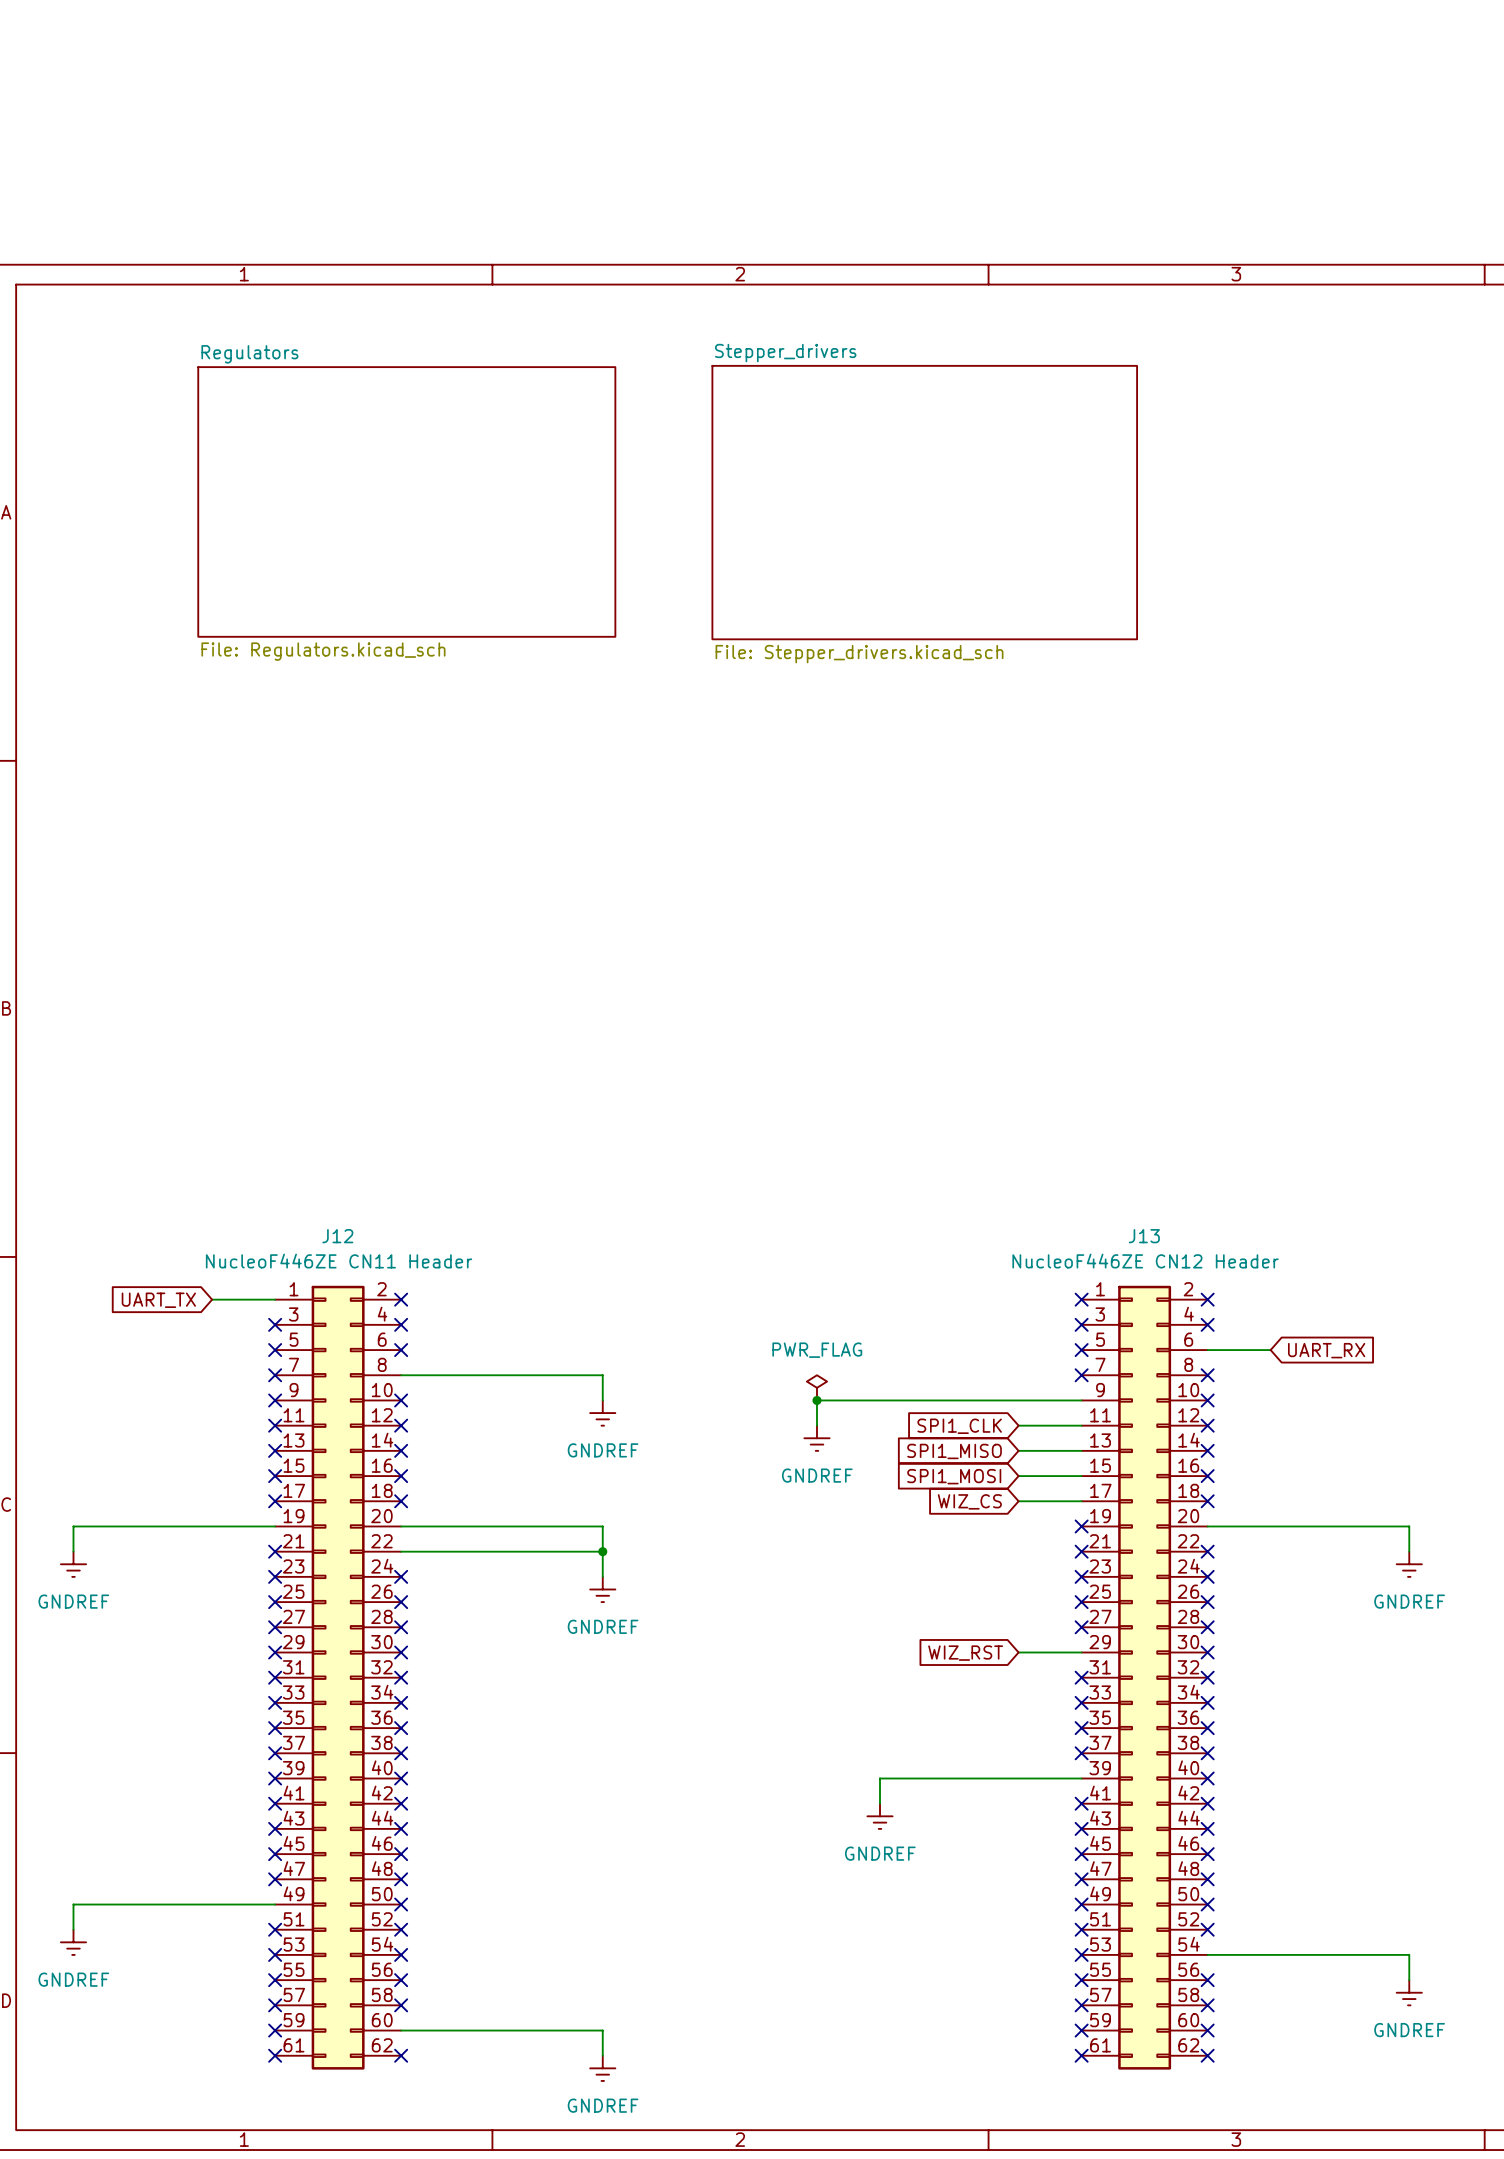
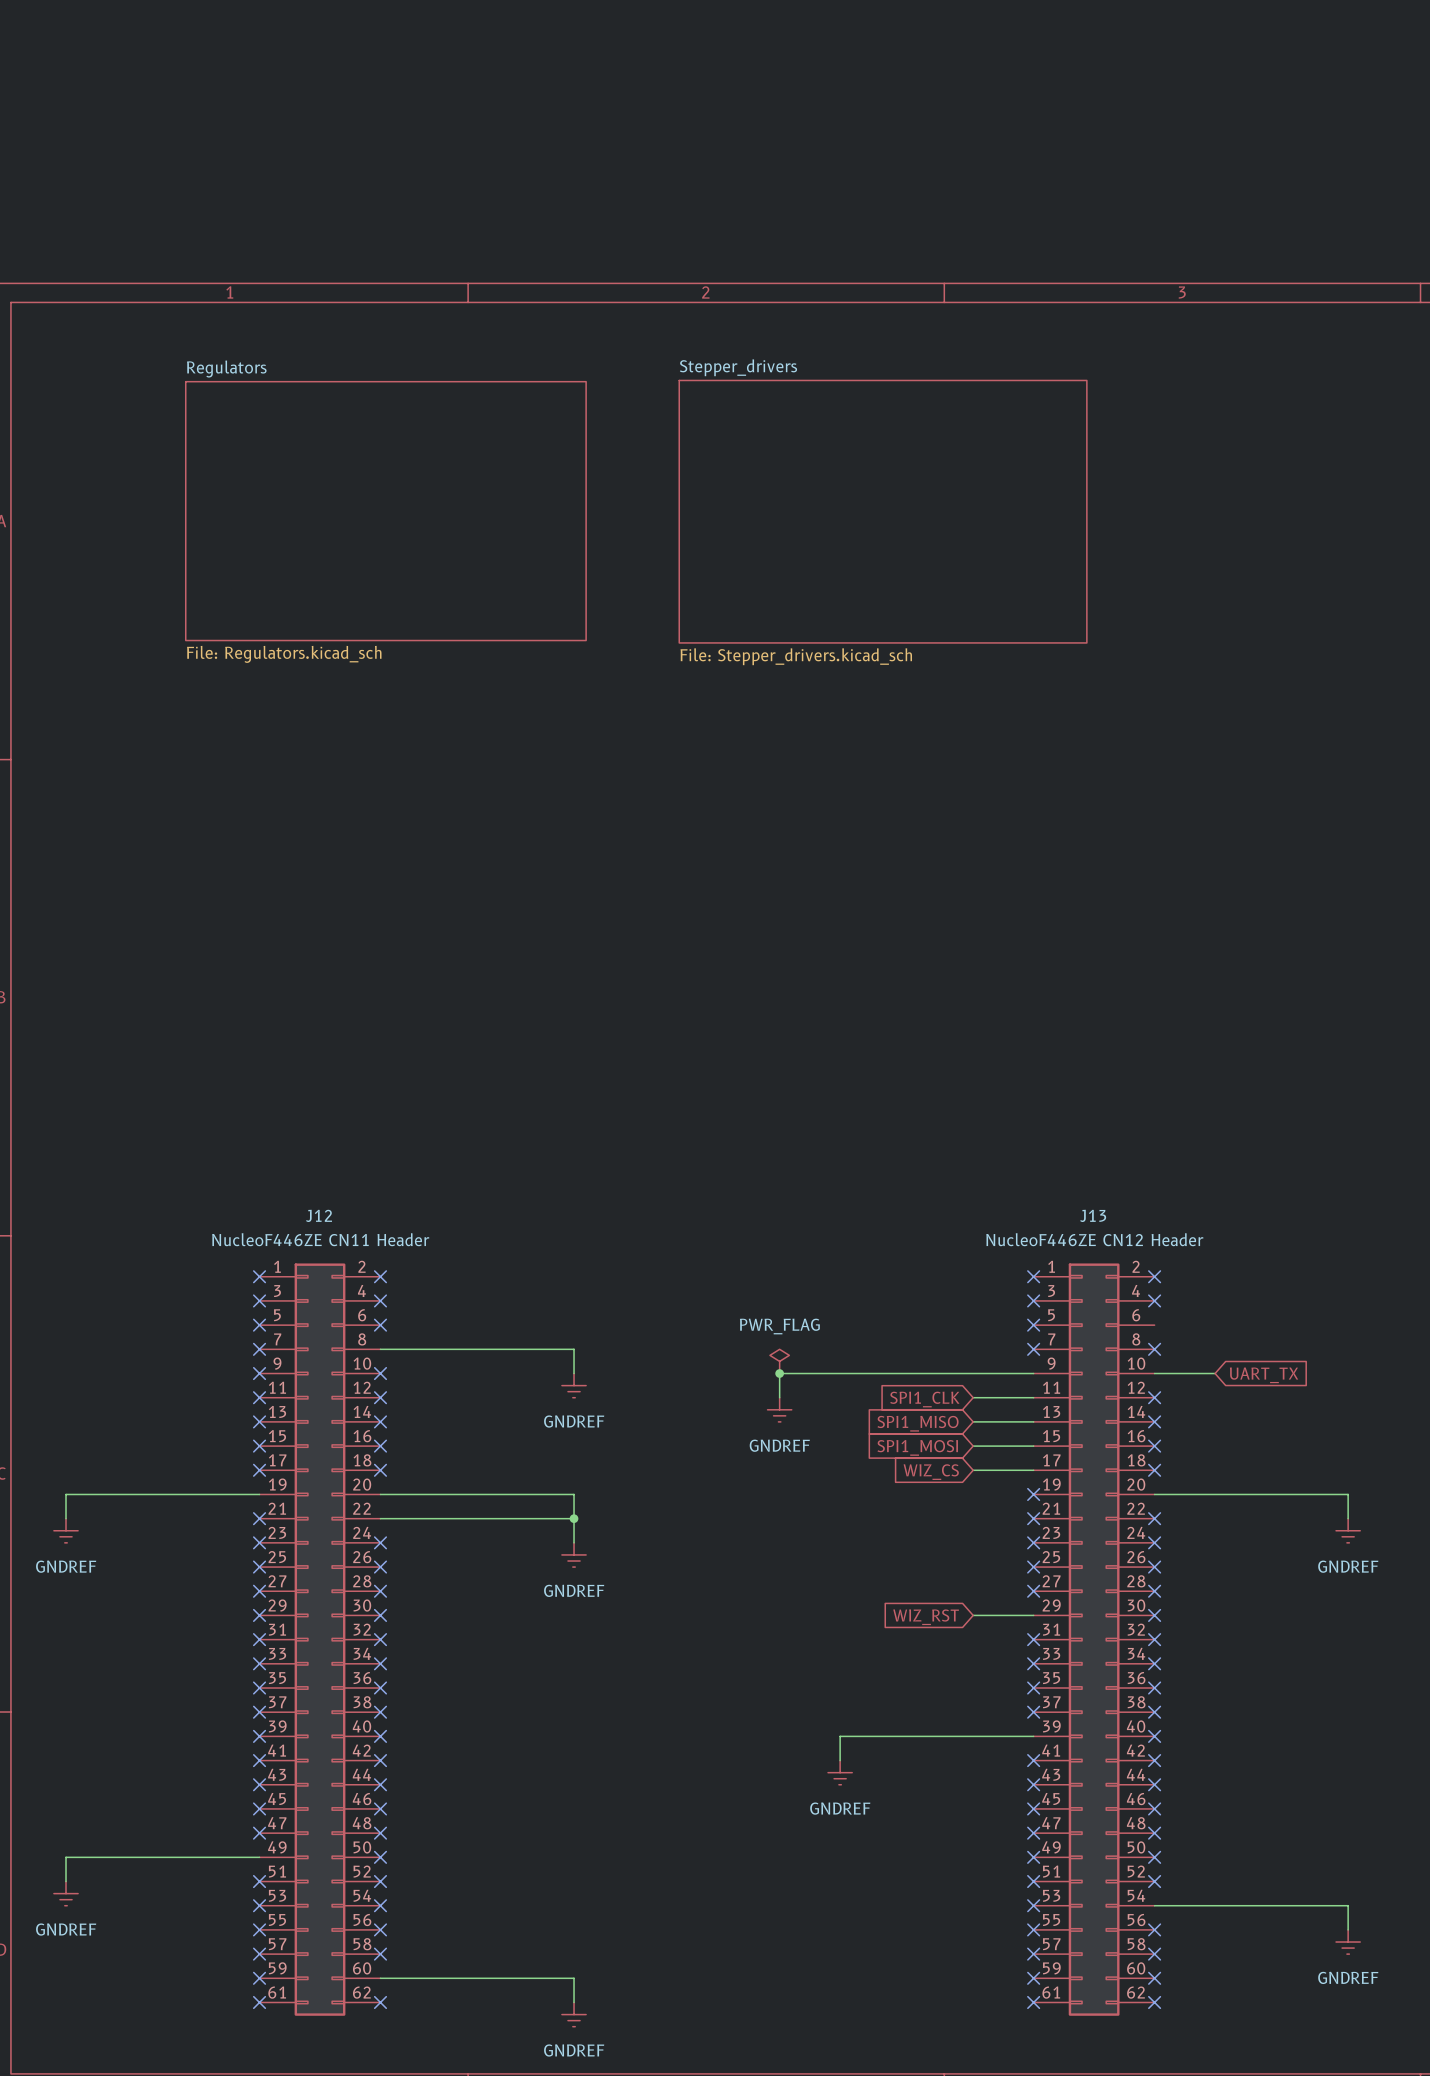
wire: (212, 1299) (275, 1299) -> none
no-connect mark: none -> (259, 1276)
global label: UART_TX (158, 1300) -> none
wire: (1207, 1350) (1270, 1350) -> (1154, 1373) (1215, 1373)
global label: UART_RX (1326, 1350) -> none
no-connect mark: (1207, 1400) -> none
global label: none -> UART_TX (1264, 1375)

